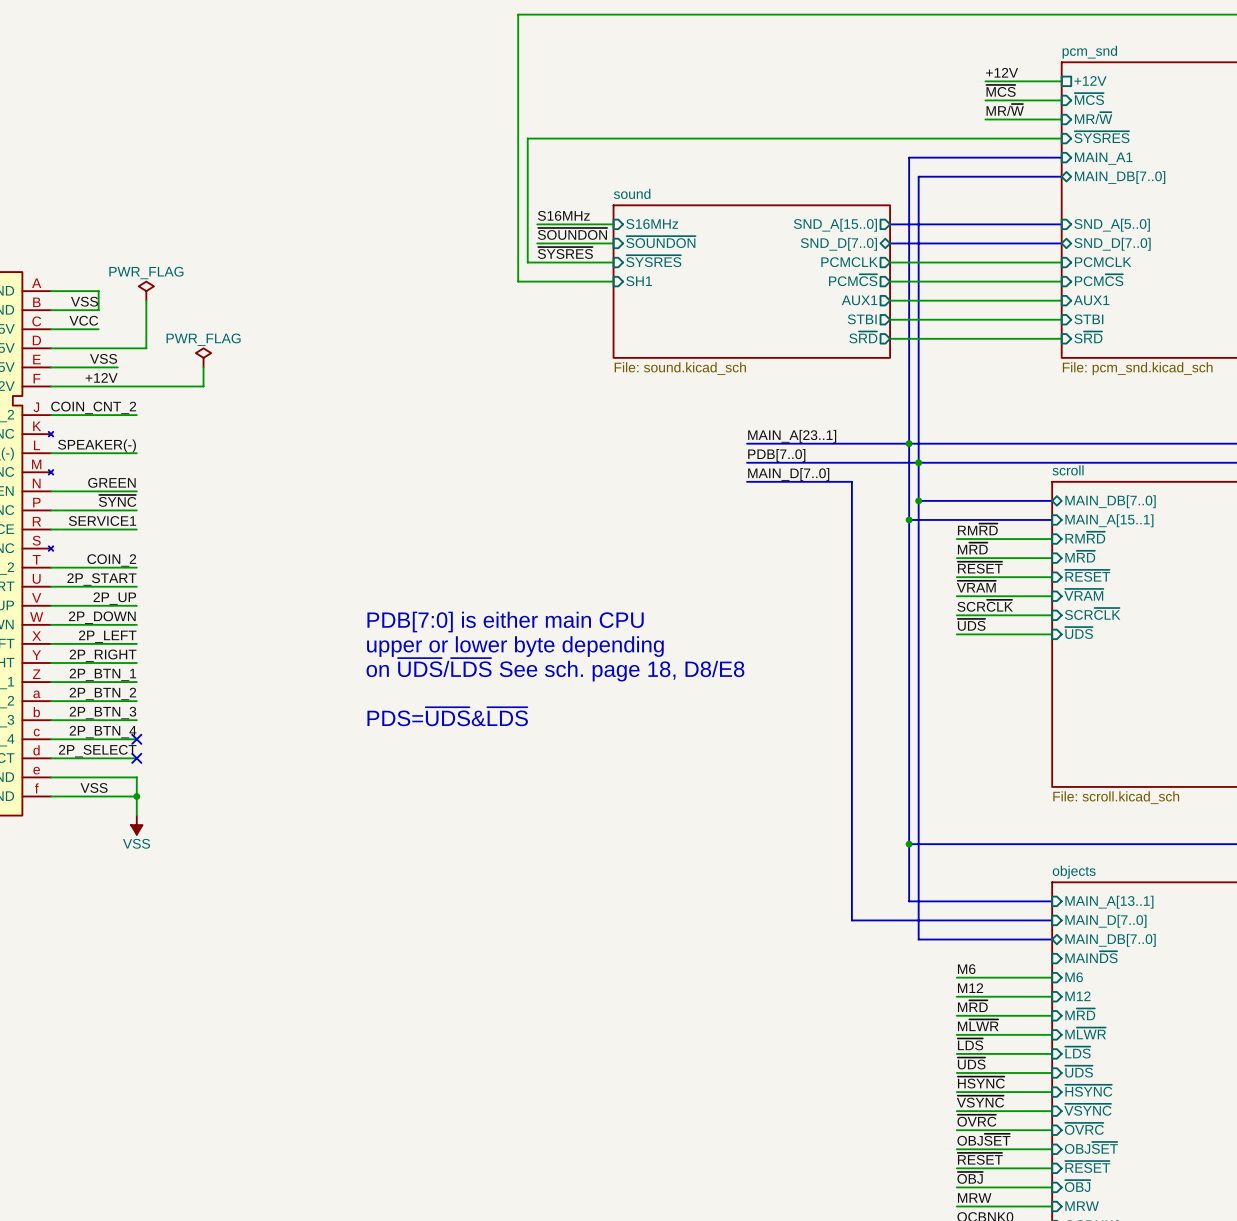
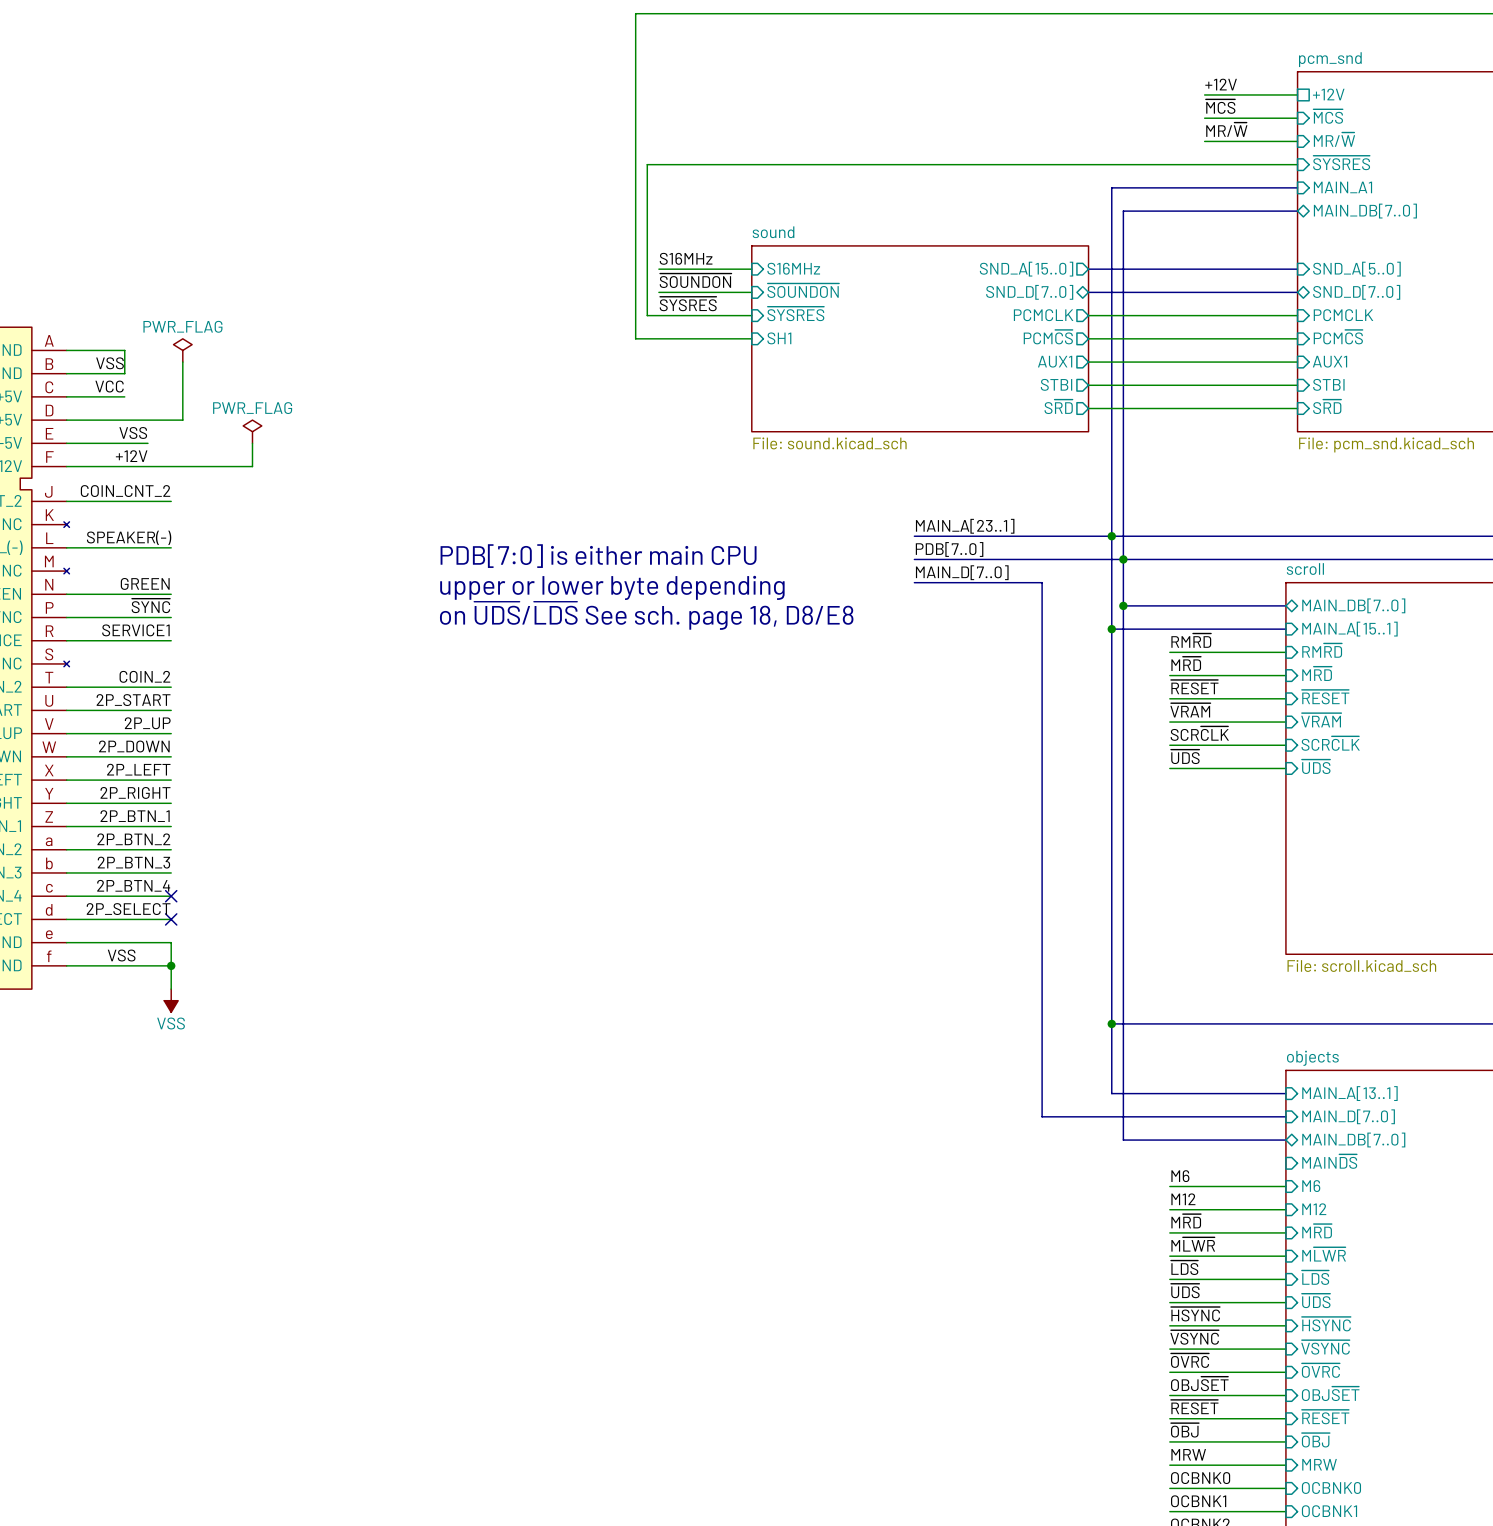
text position: PDB[7:0] is either main CPU (505, 622) -> PDB[7:0] is either main CPU (598, 556)
text position: upper or lower byte depending (515, 646) -> upper or lower byte depending (612, 587)
text position: on ~{UDS}/~{LDS} See sch. page 18, D8/E8 (555, 669) -> on ~{UDS}/~{LDS} See sch. page 18, D8/E8 (646, 615)
text: PDS=~{UDS}&~{LDS} (447, 716) -> none

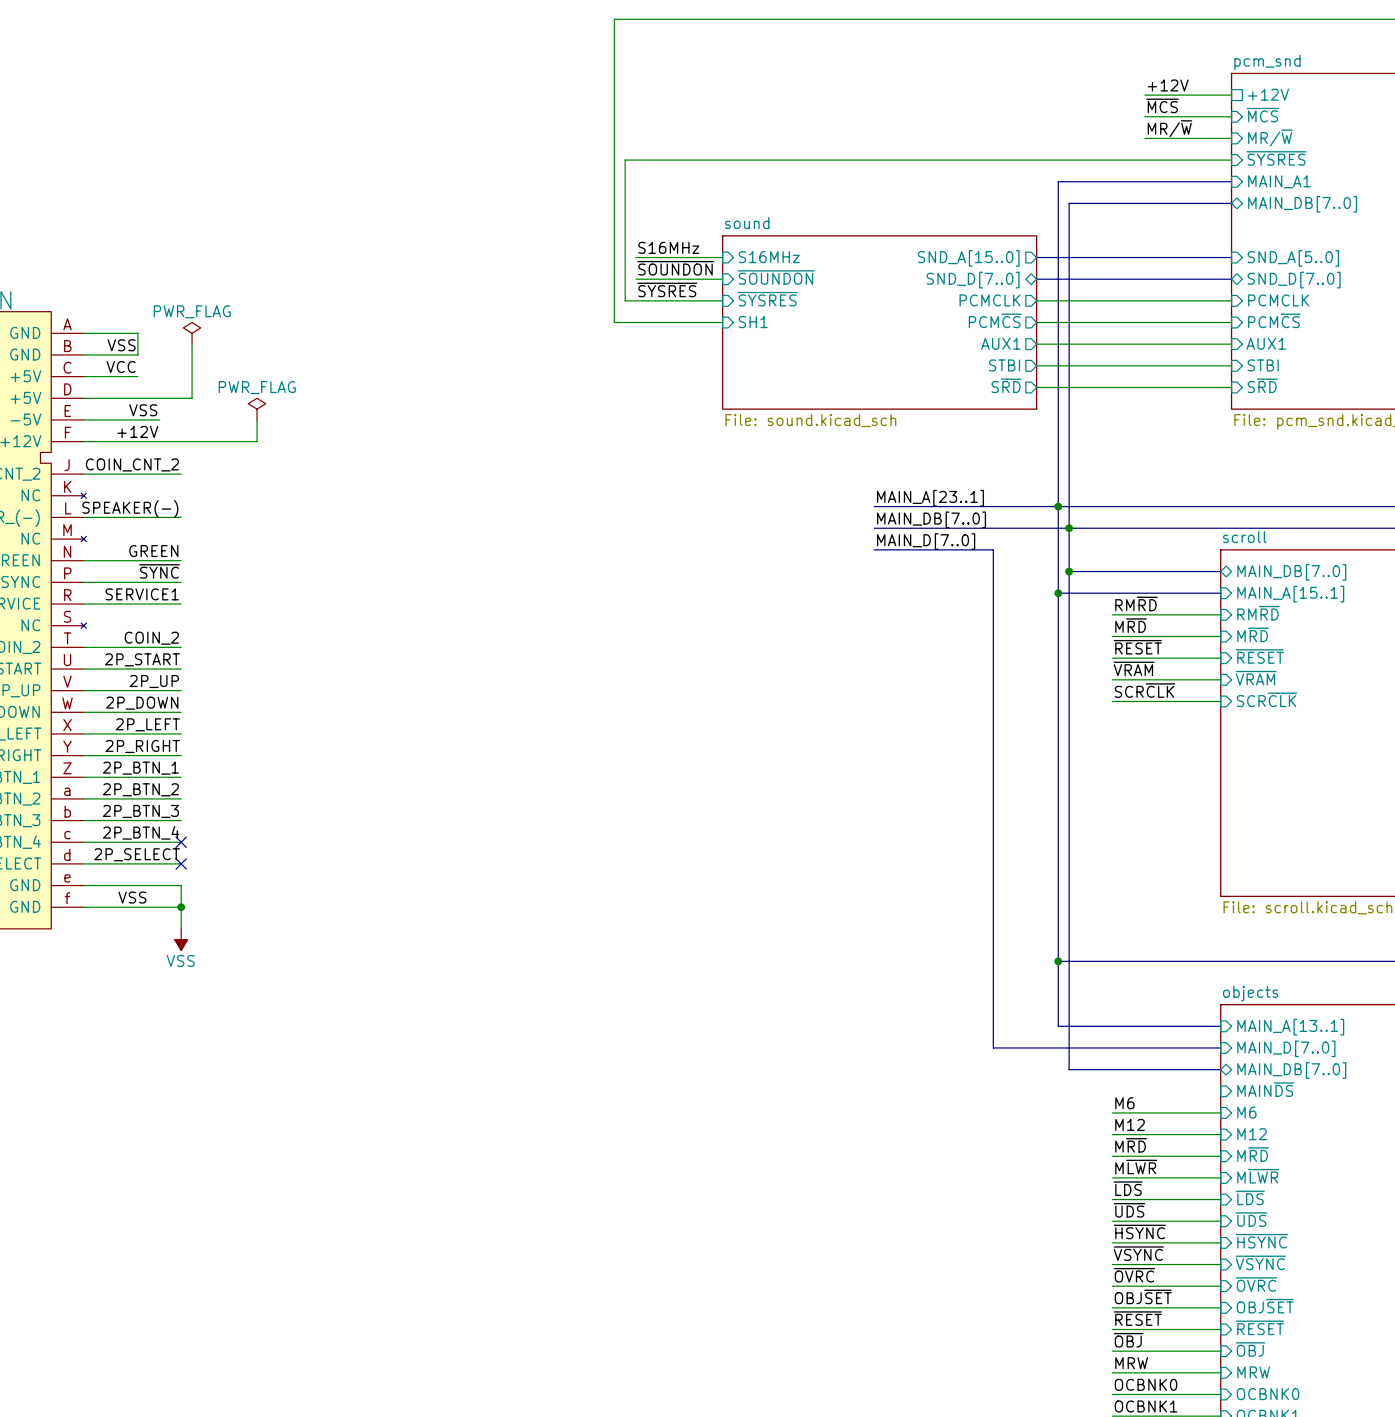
label: PDB[7..0] (949, 549) -> MAIN_DB[7..0] (931, 519)
text: PDB[7:0] is either main CPU (598, 556) -> none
text: upper or lower byte depending (612, 587) -> none
text: on ~{UDS}/~{LDS} See sch. page 18, D8/E8 (646, 615) -> none
label: ~{UDS} (1185, 756) -> none
sheet pin: ~{UDS} (1316, 766) -> none
wire: (1169, 768) (1285, 768) -> none

